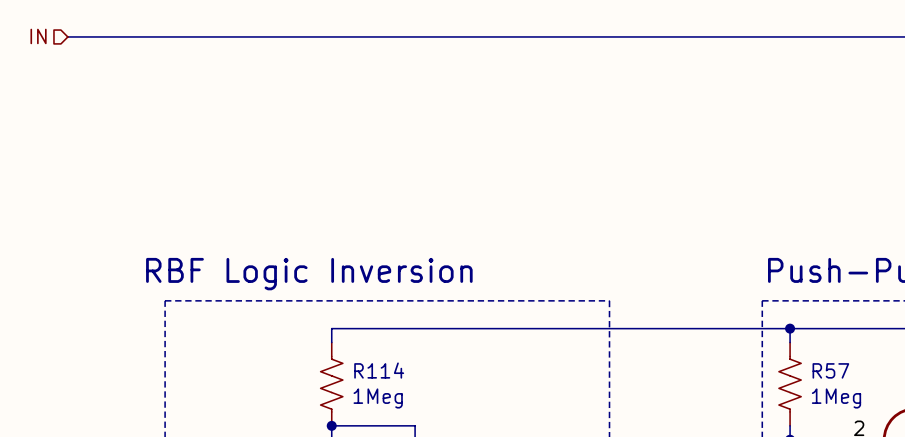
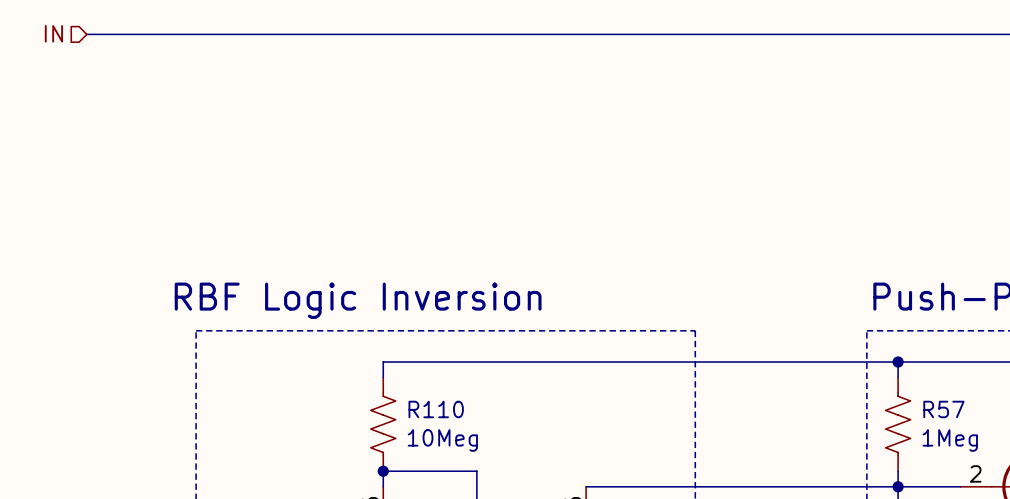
R114 name: R114 (379, 370) -> R110 (436, 409)
R114 value: 1Meg (378, 398) -> 10Meg (442, 440)

